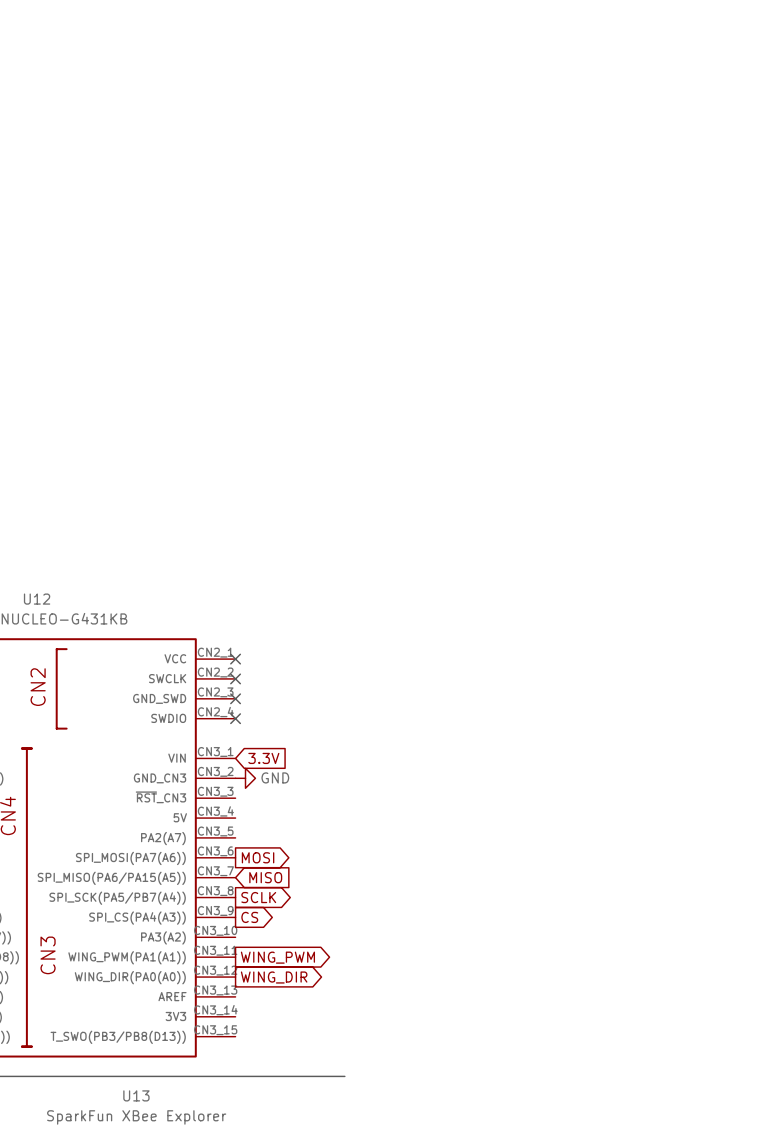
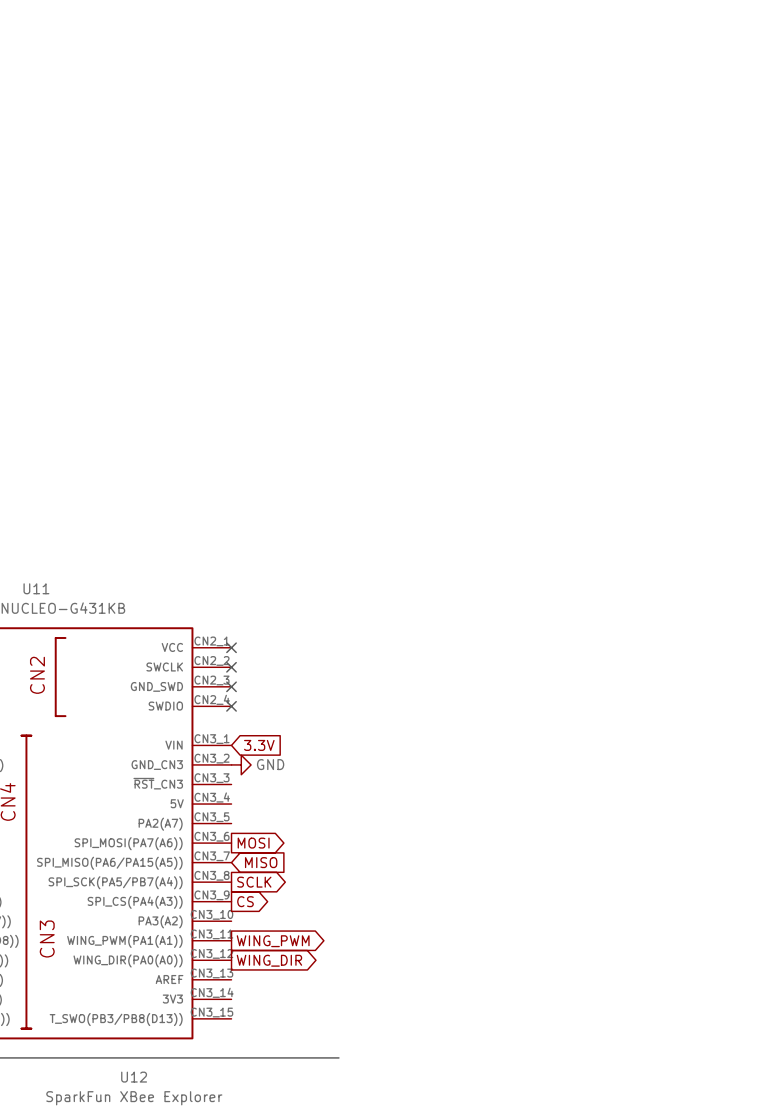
U12 name: U12 (37, 599) -> U11 (36, 588)
U13 name: U13 (136, 1095) -> U12 (134, 1077)

